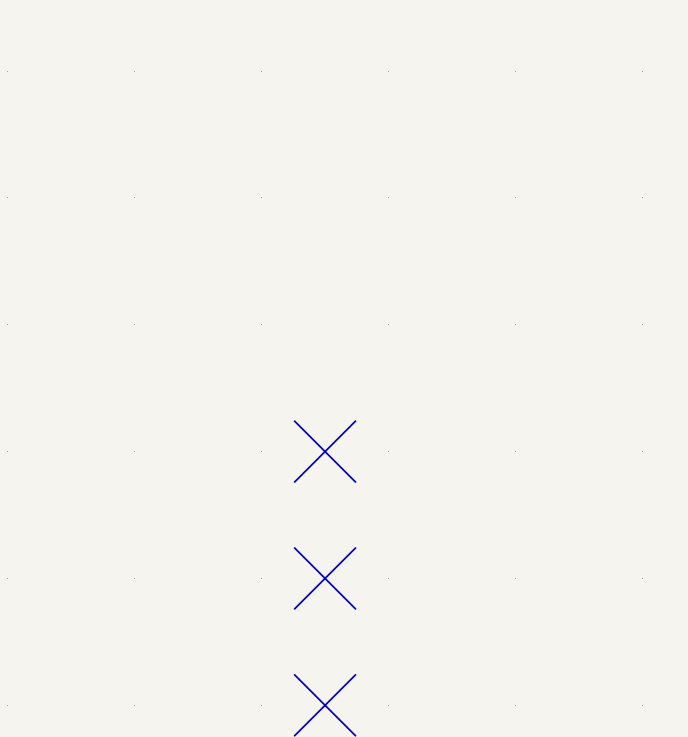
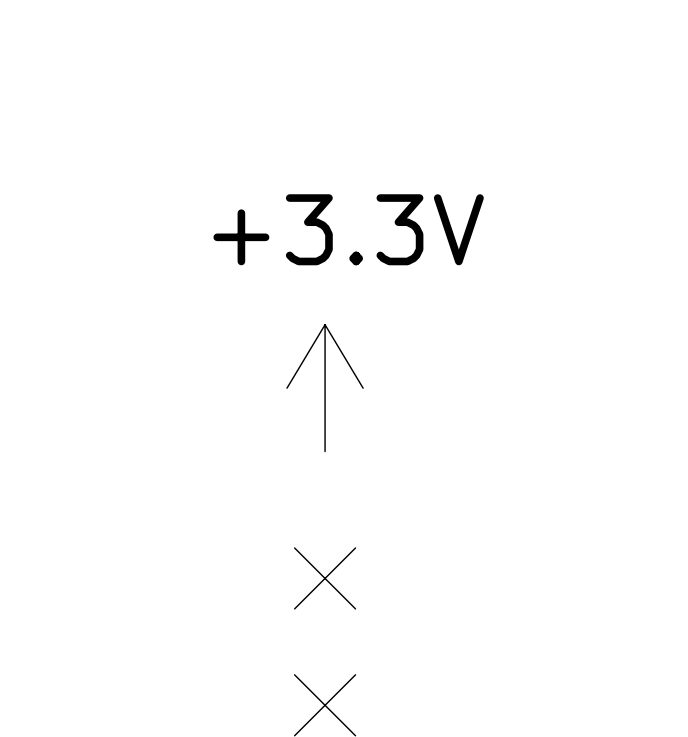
power symbol: none -> +3.3V (325, 388)
no-connect mark: (325, 451) -> none

